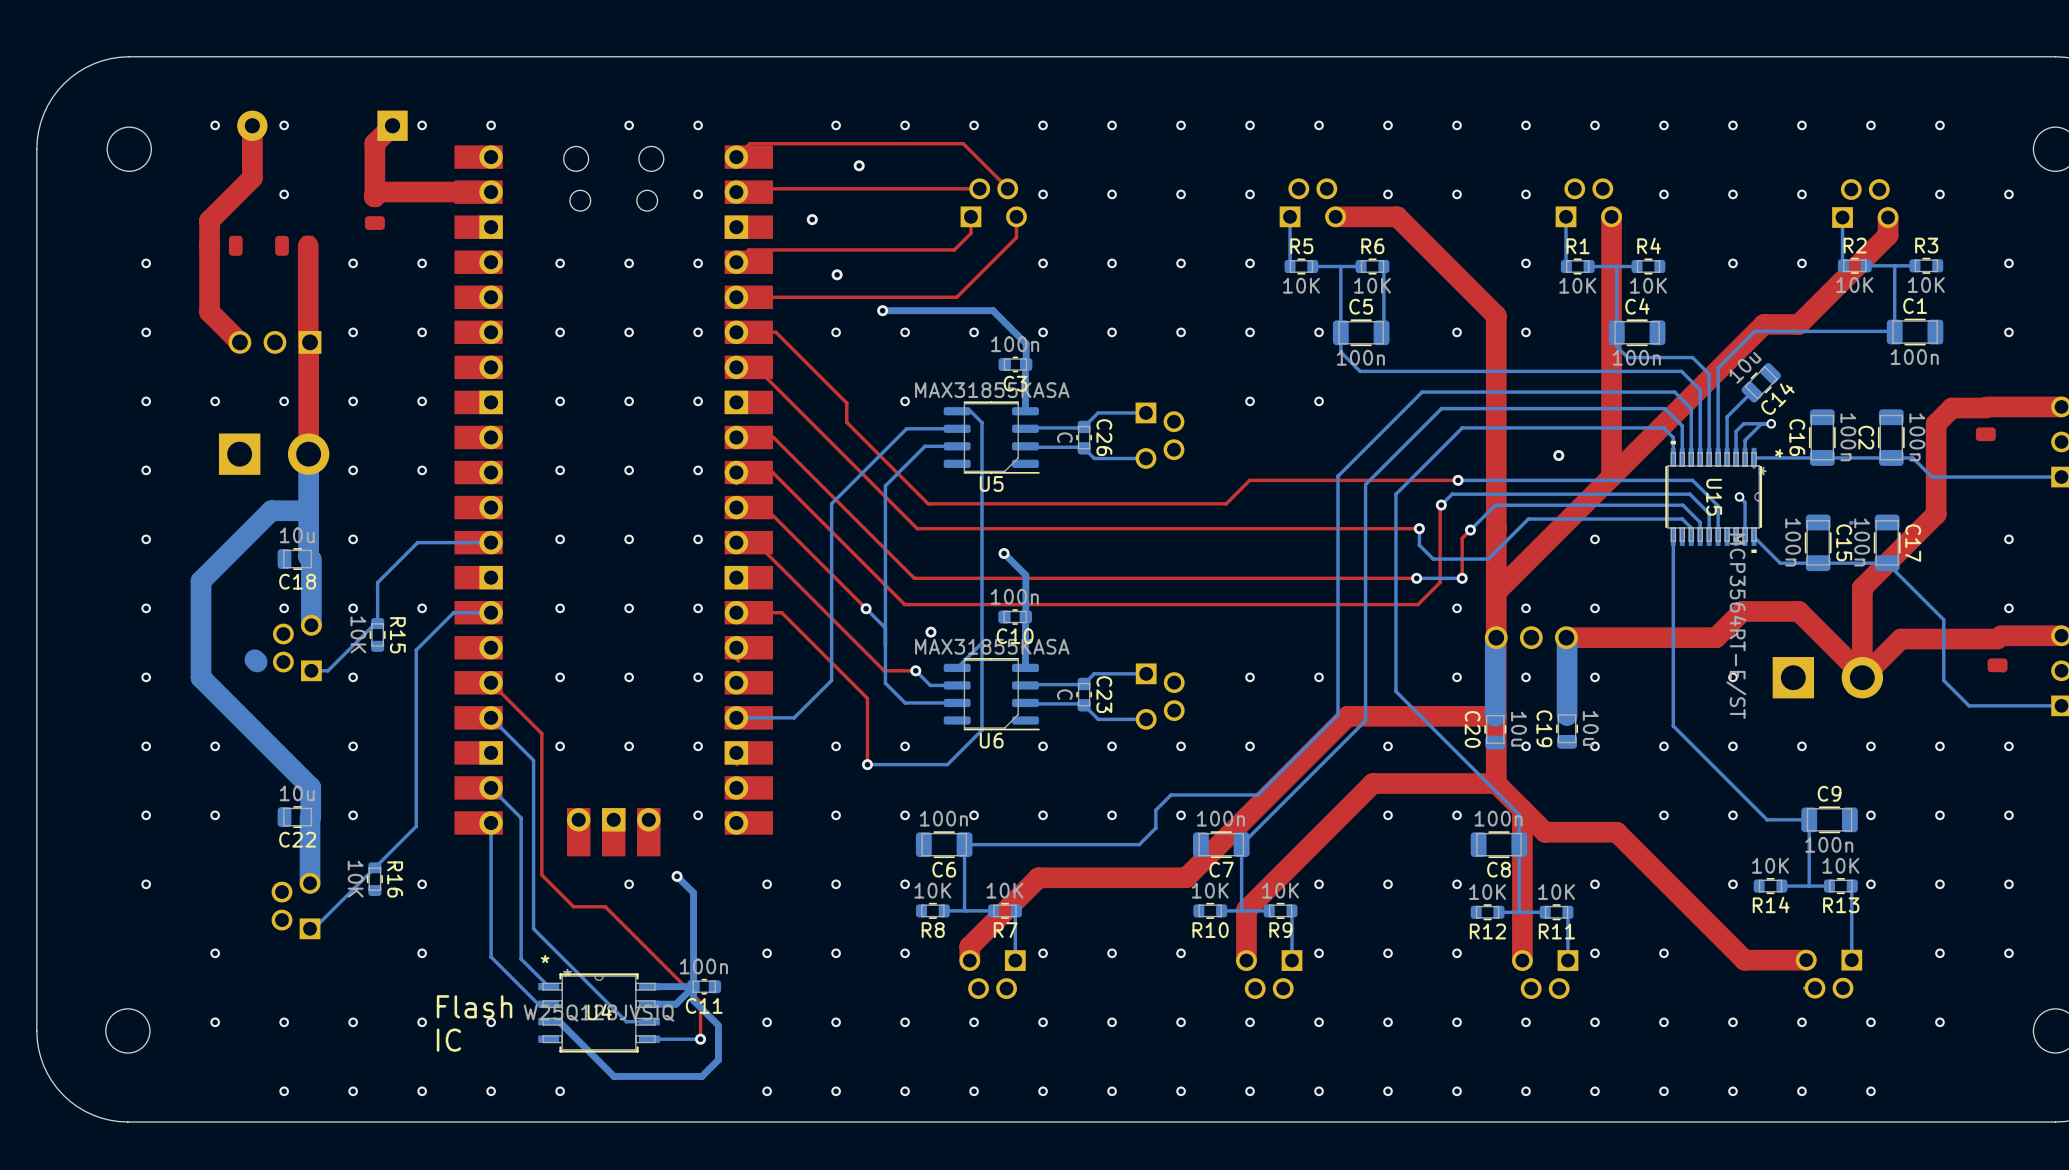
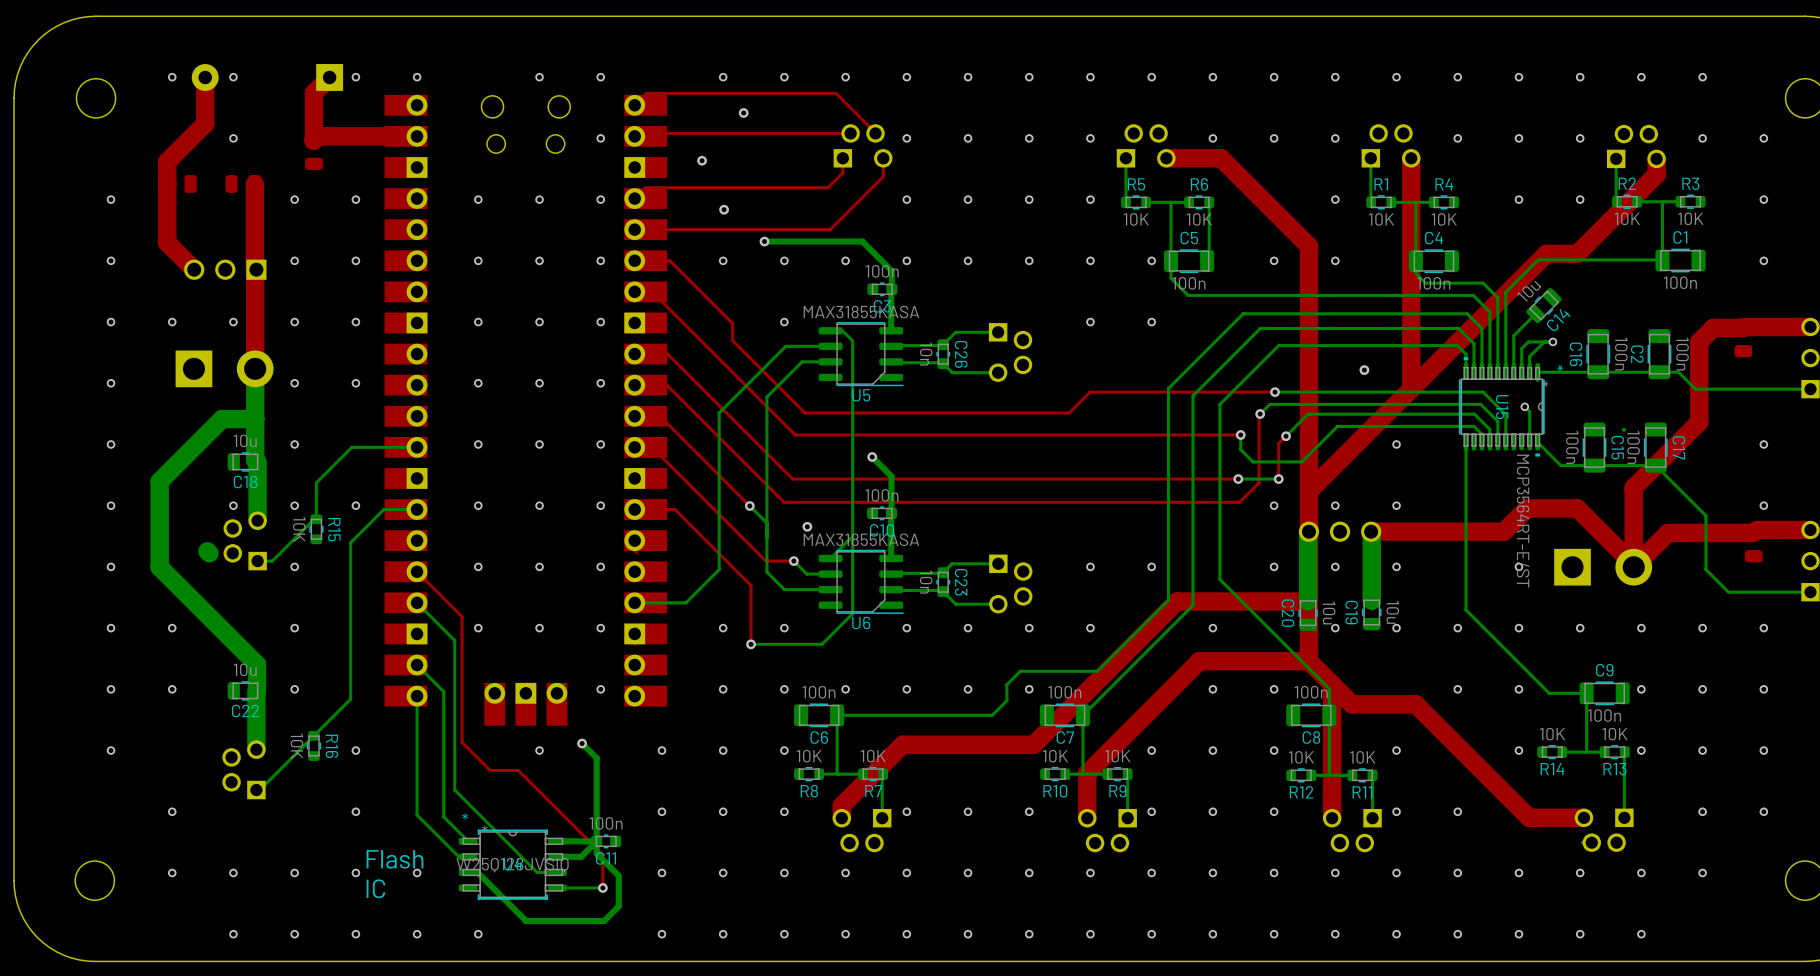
C26 value: C (1064, 437) -> 10n (926, 354)
C23 value: C (1064, 694) -> 10n (926, 582)

